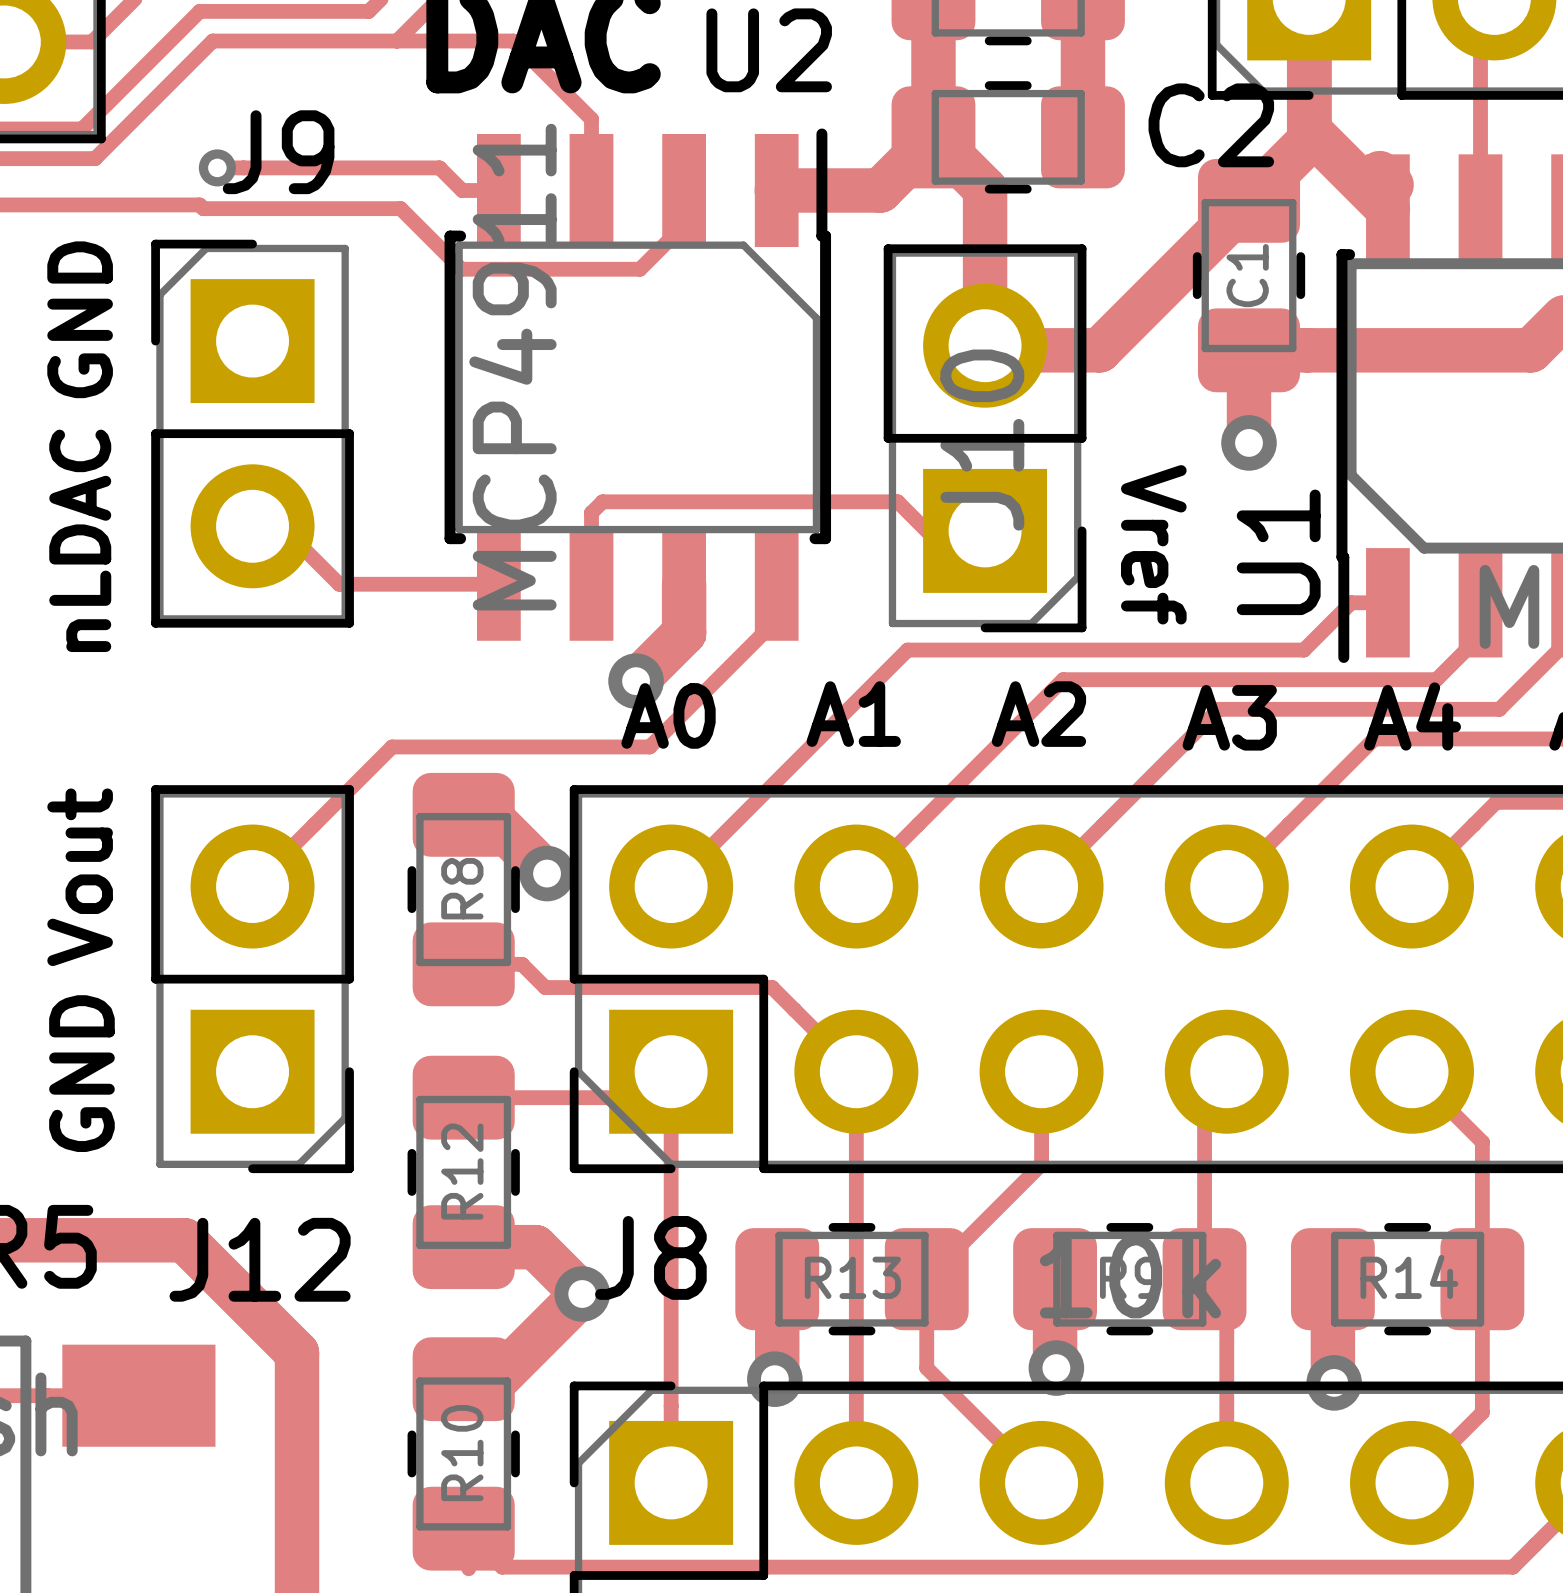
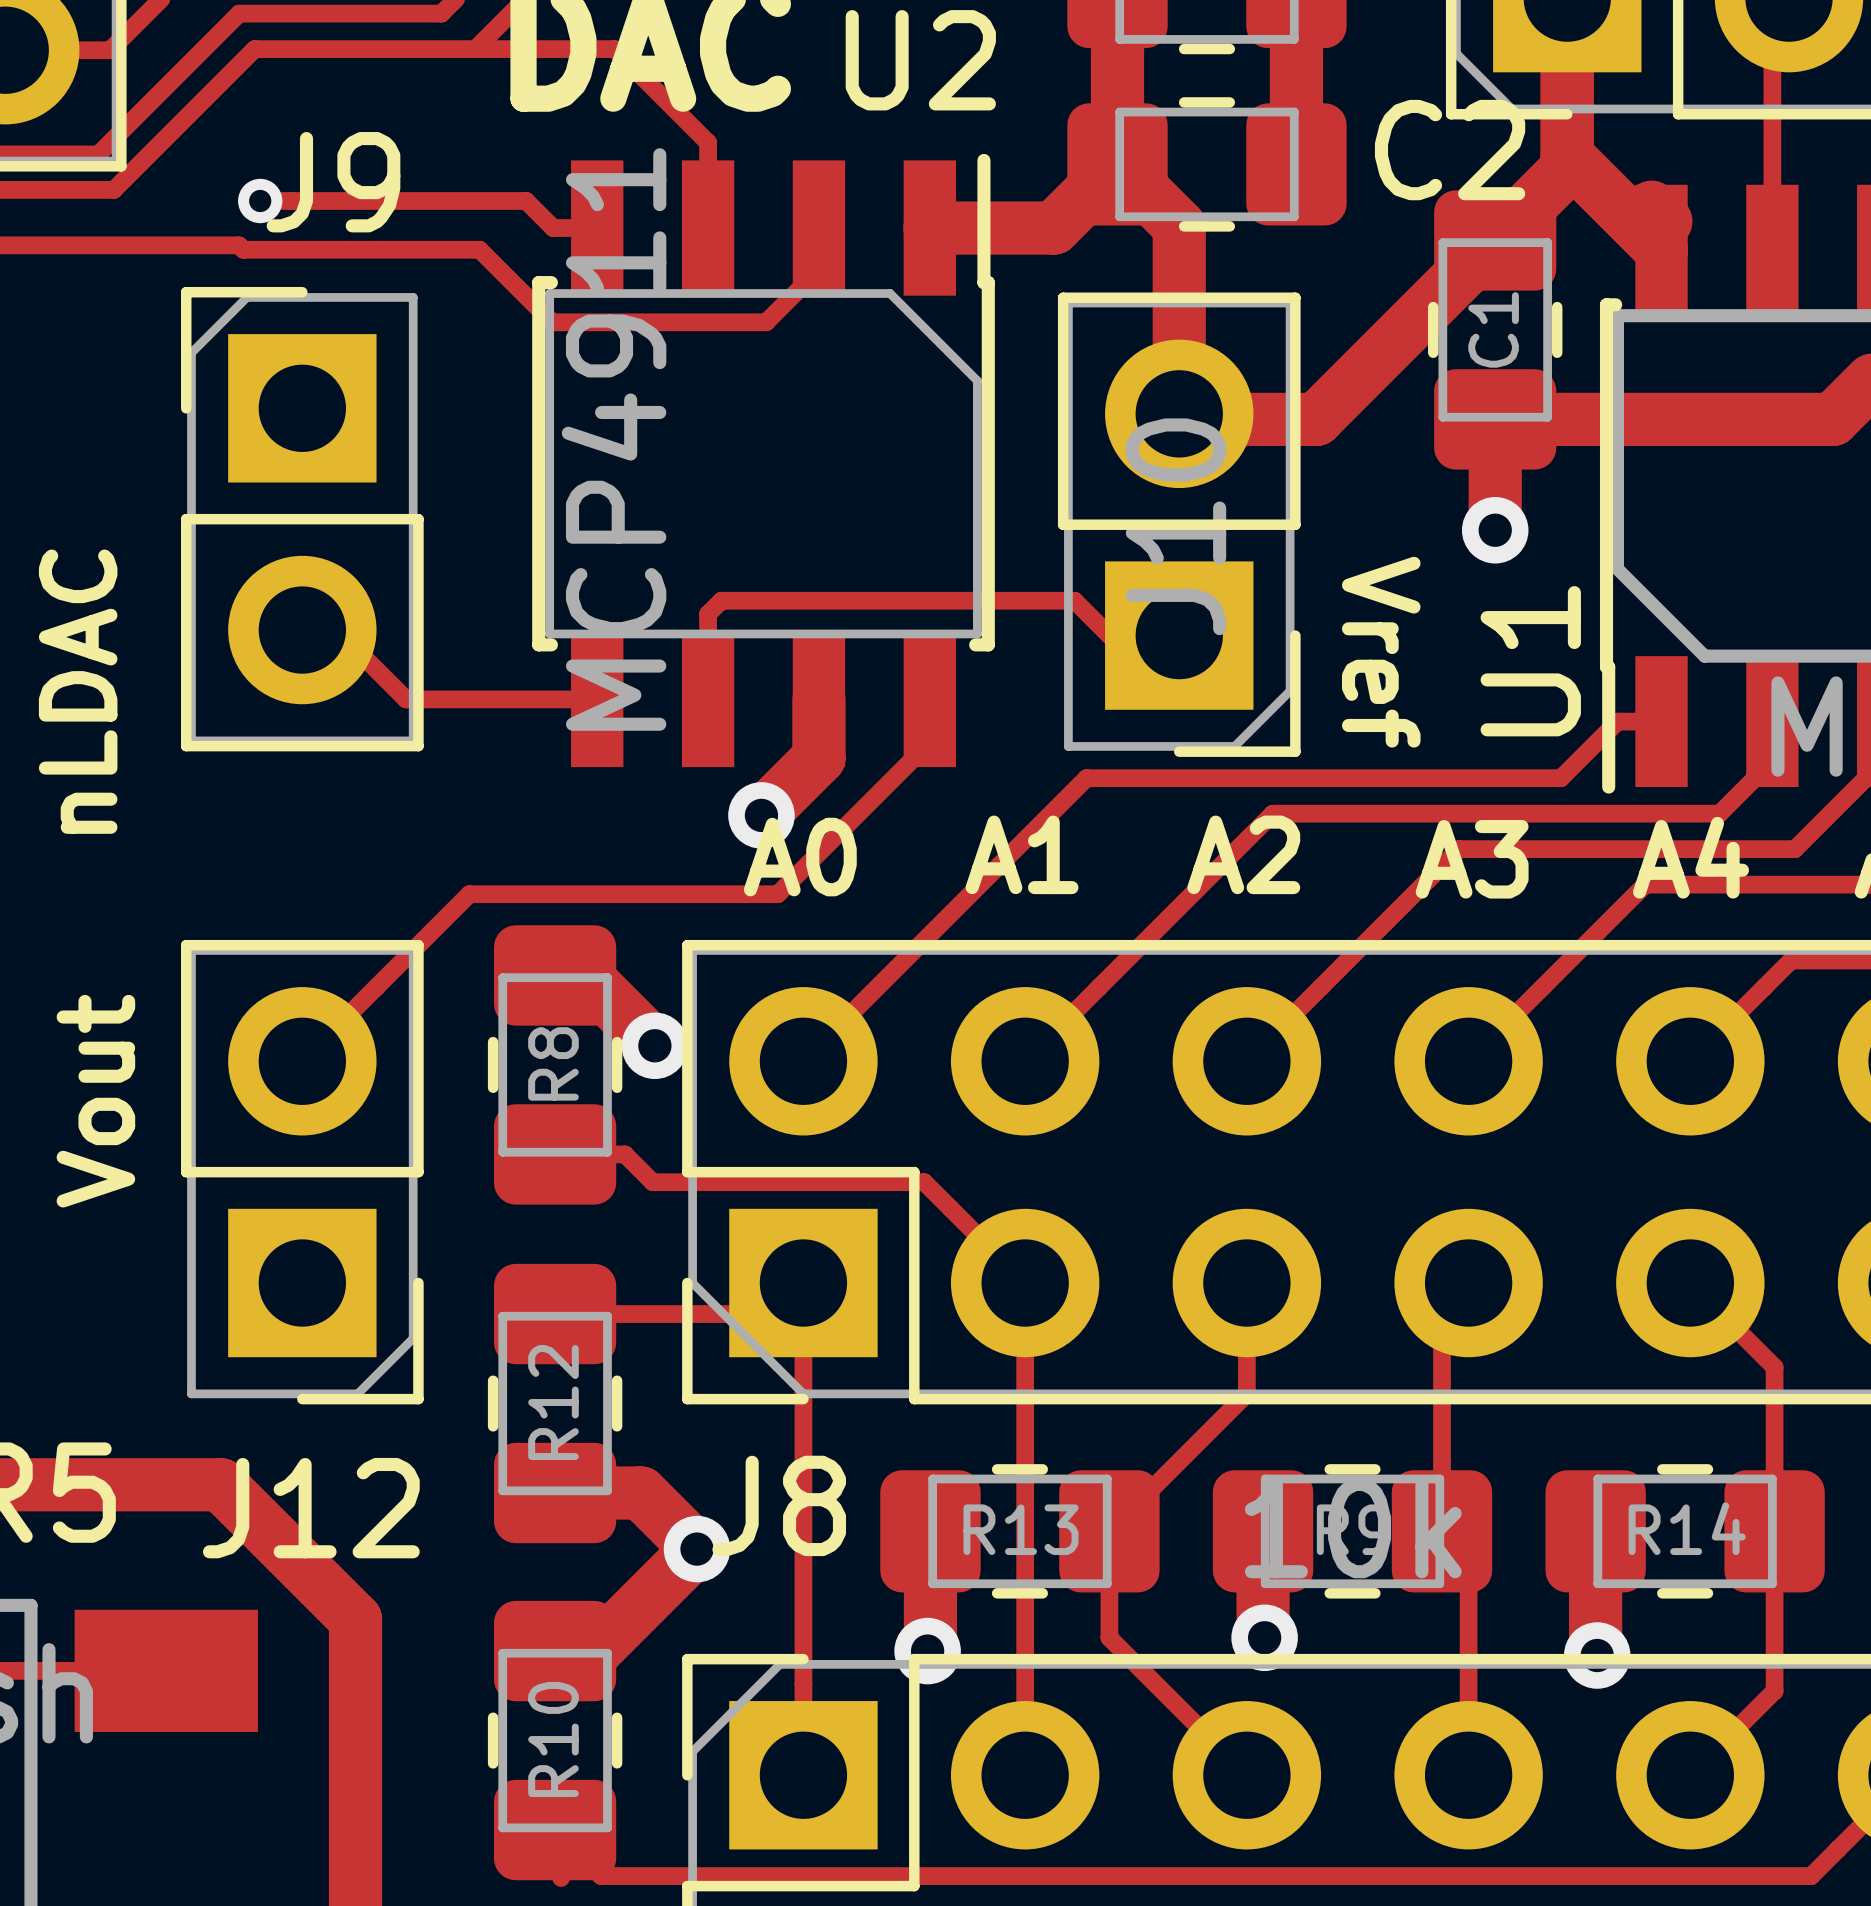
text: GND (80, 319) -> none
text position: nLDAC (80, 540) -> nLDAC (78, 691)
text position: Vout (80, 877) -> Vout (95, 1101)
text: GND (81, 1073) -> none

